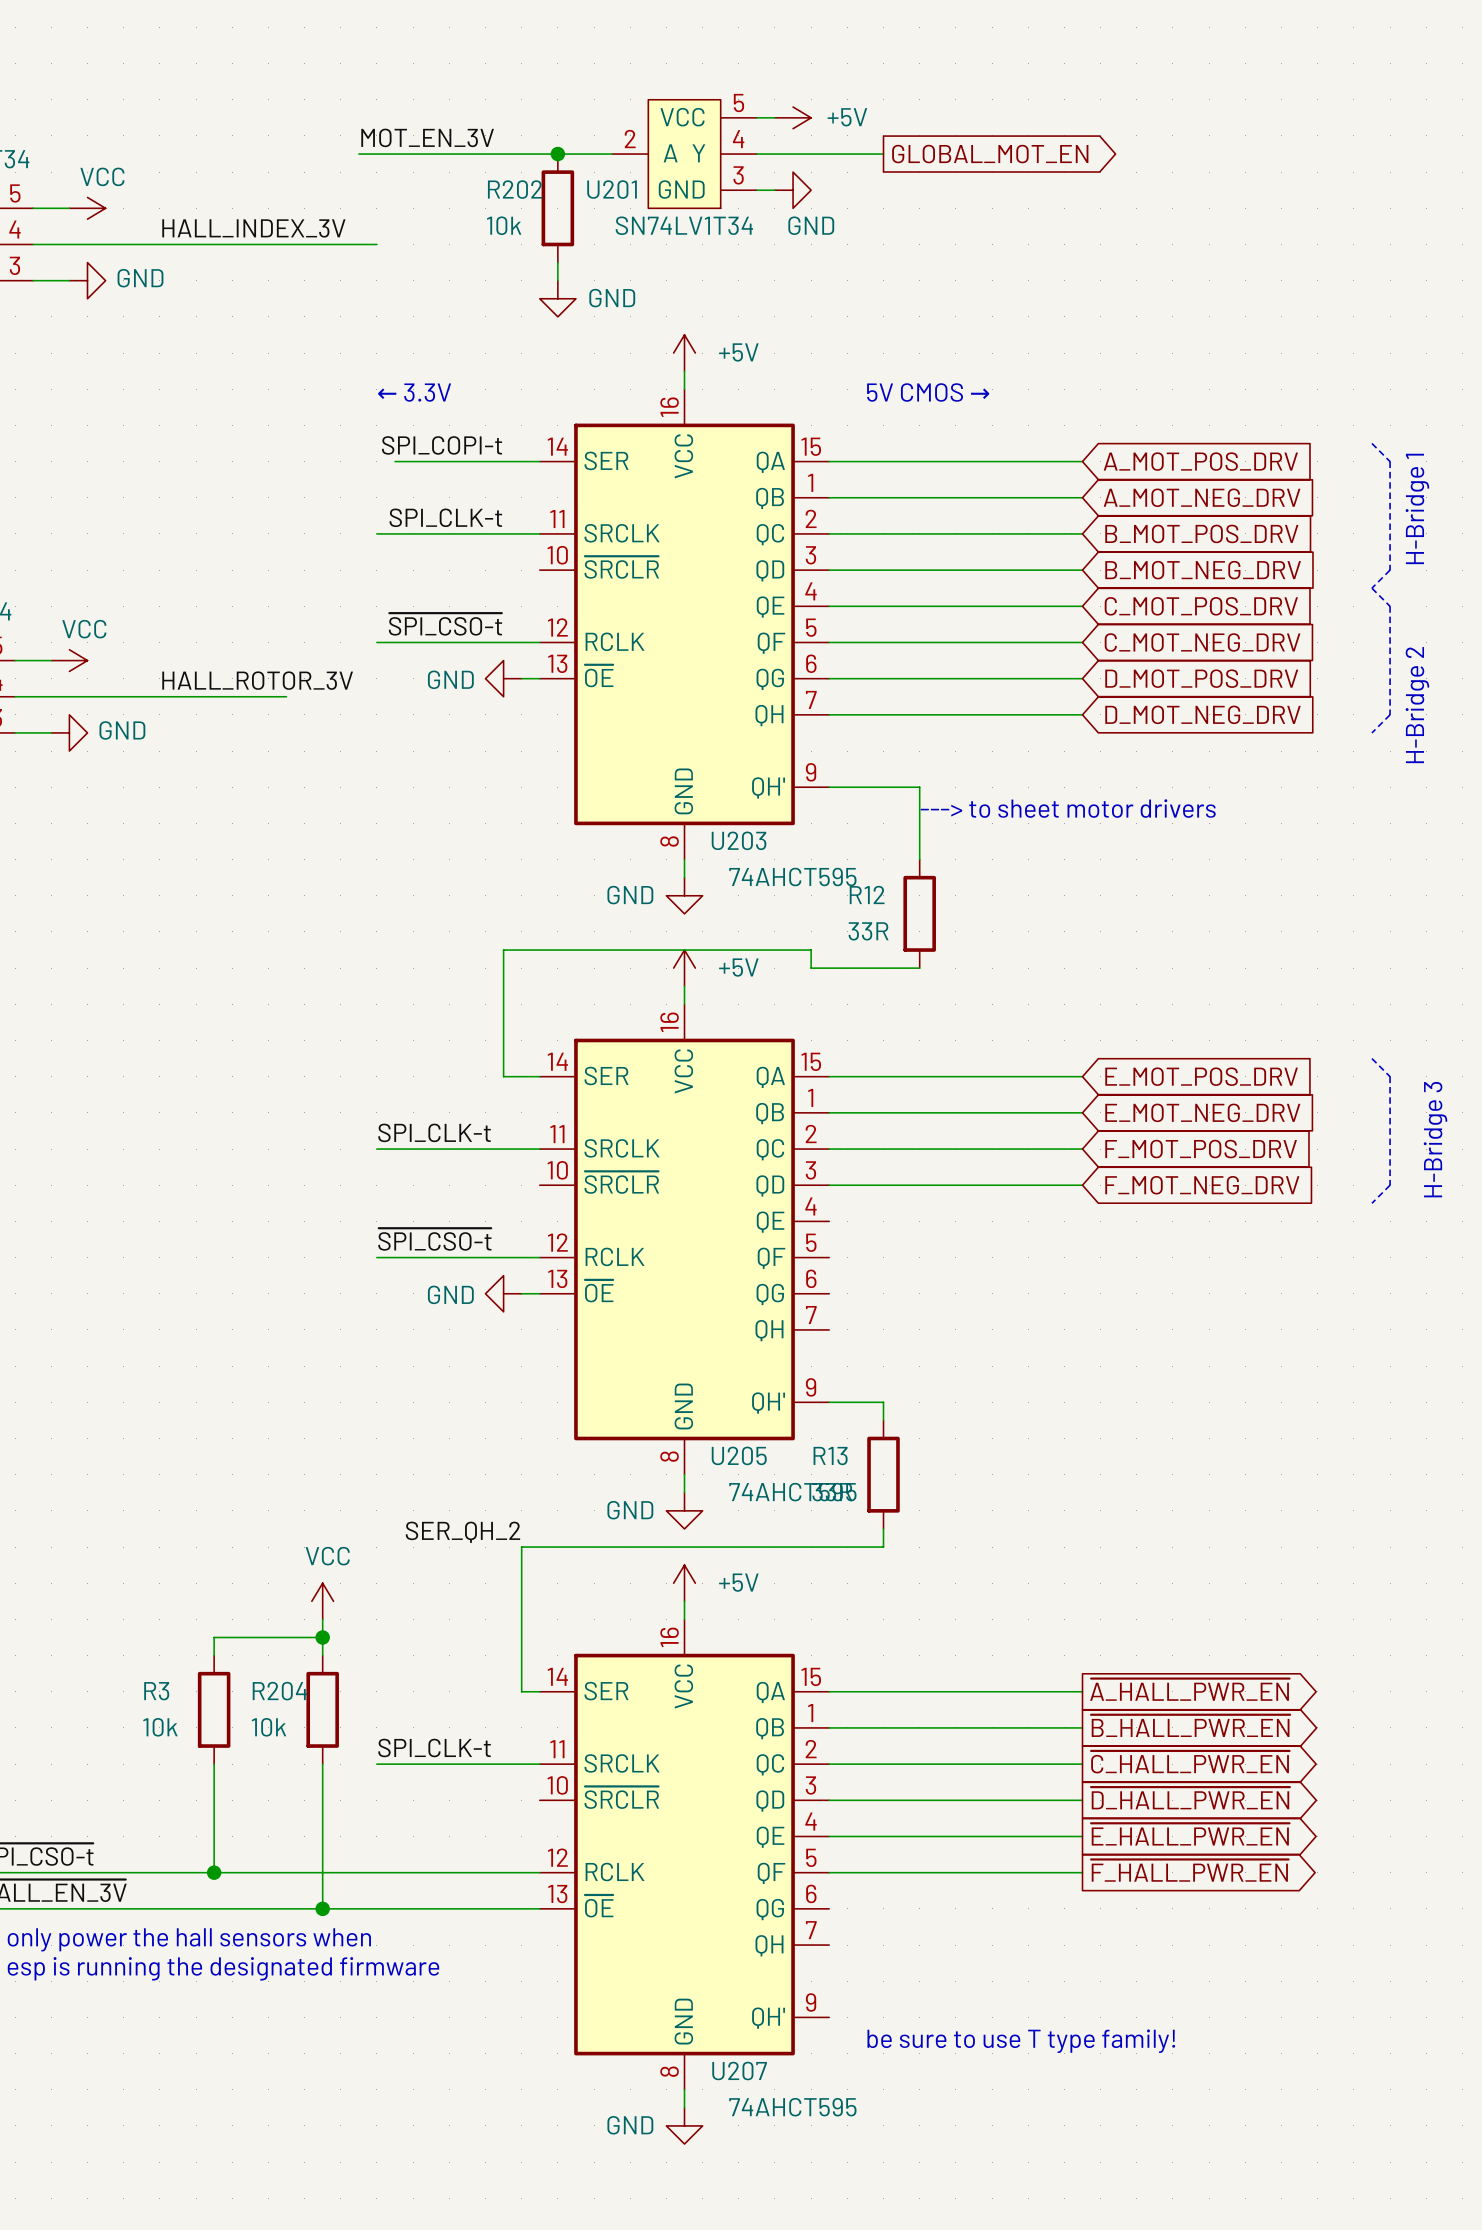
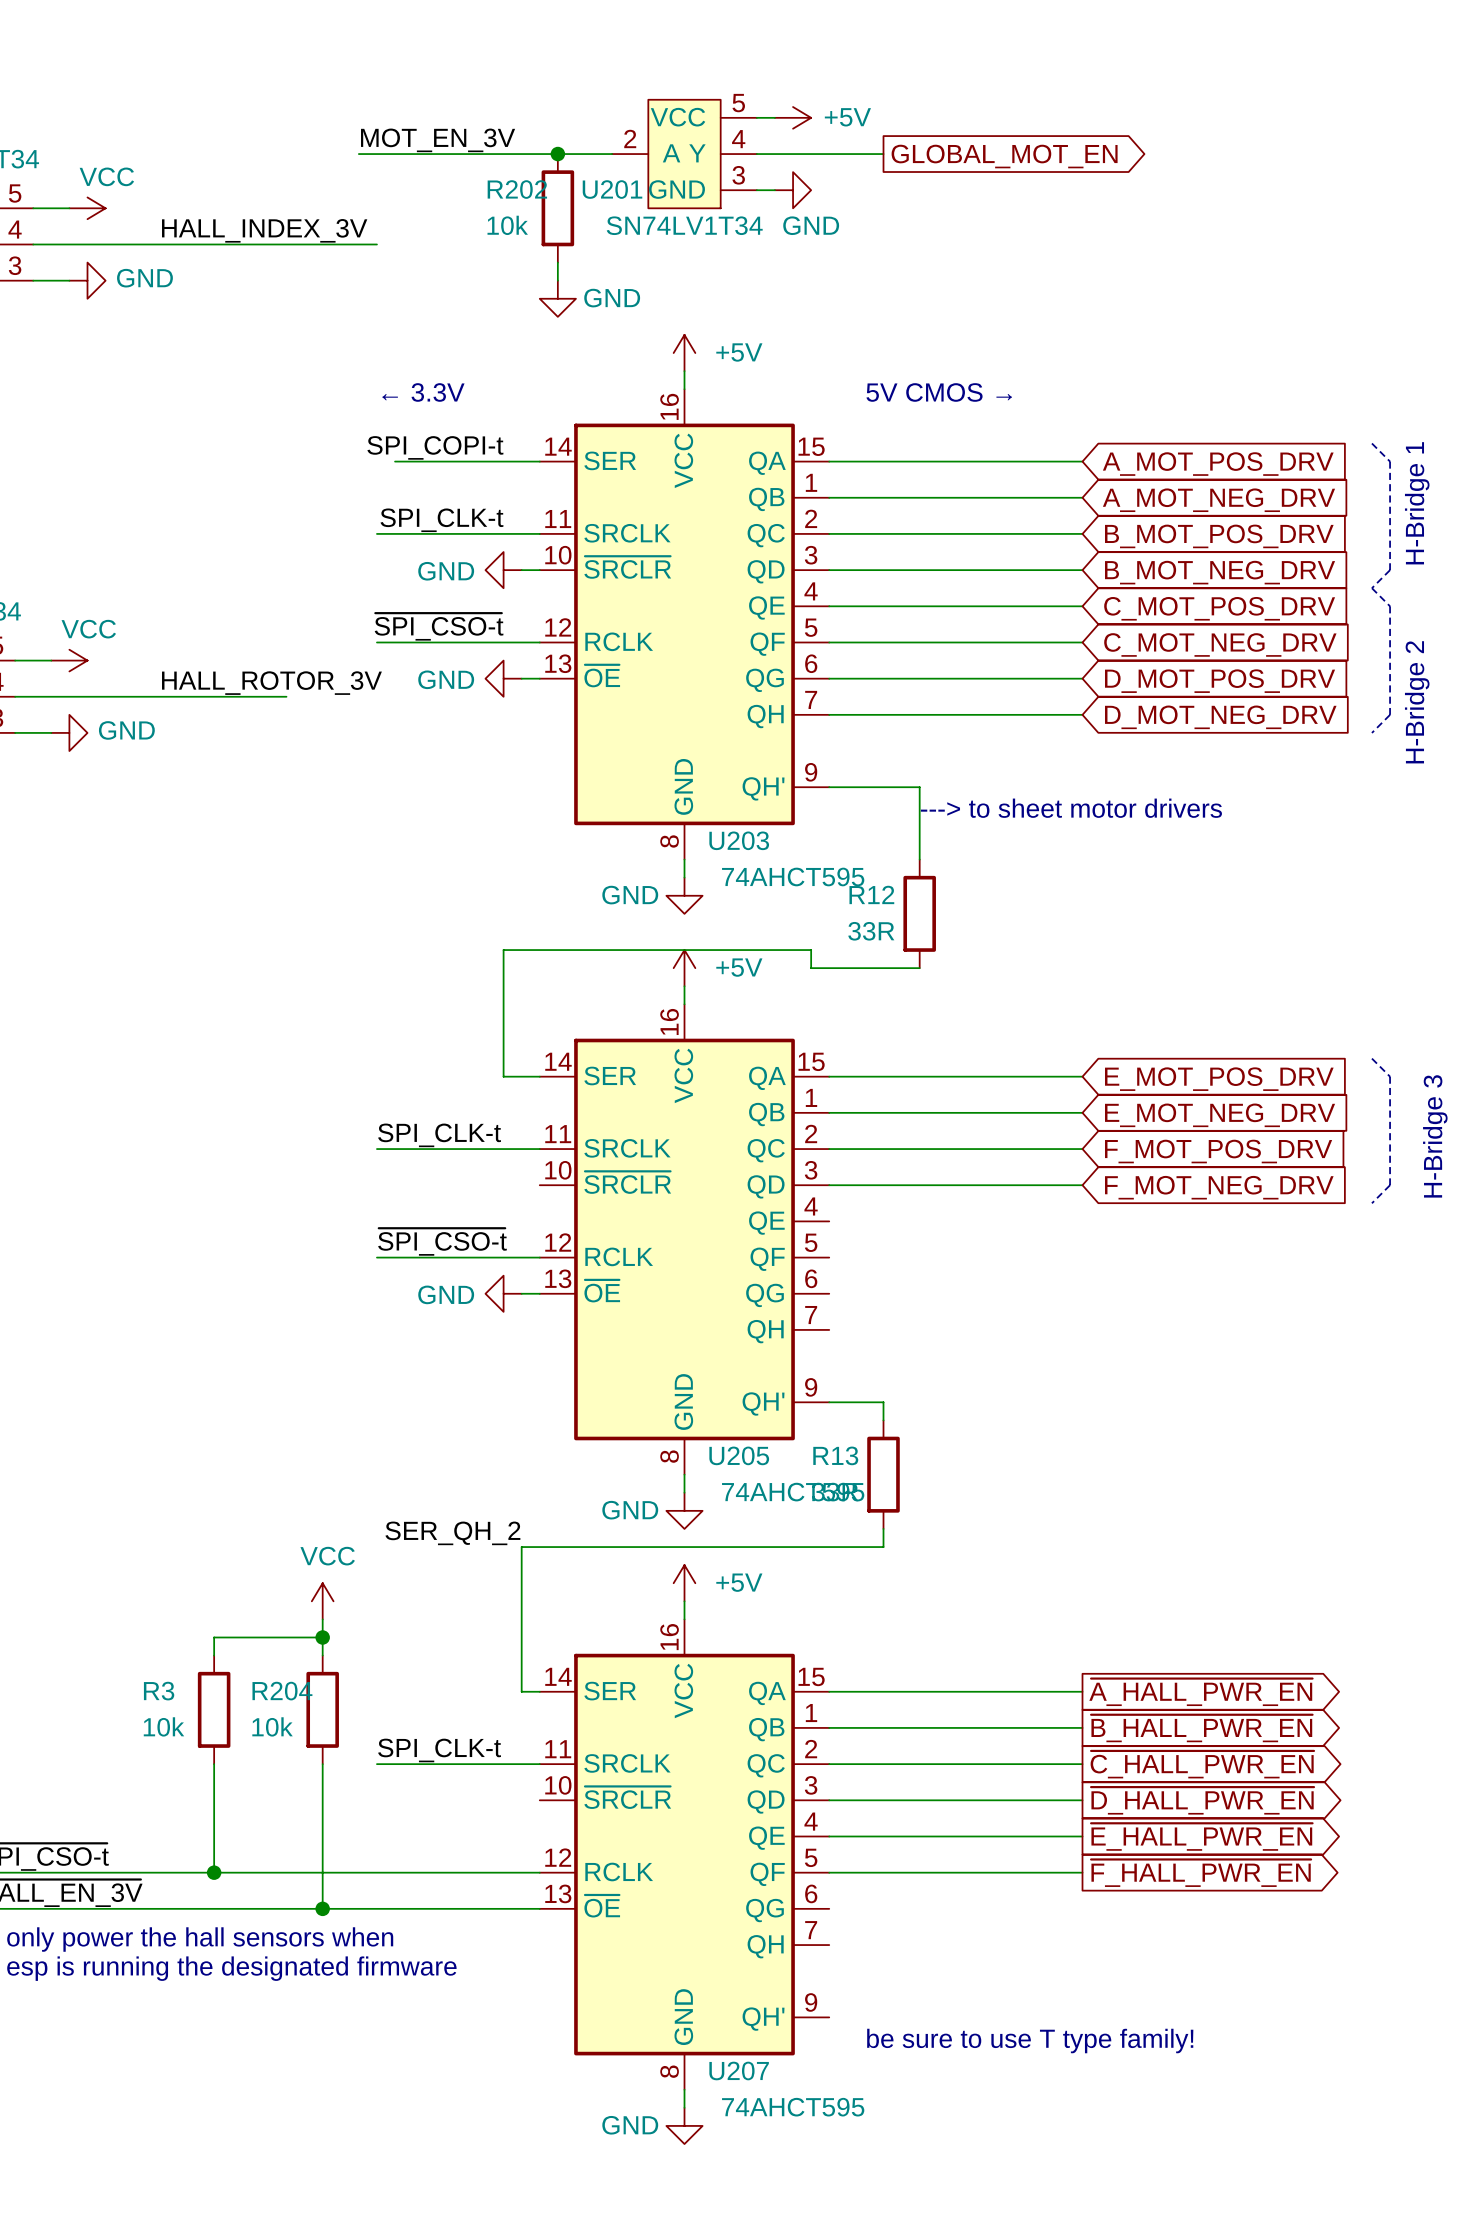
power symbol: none -> GND (503, 570)
wire: none -> (521, 570) (539, 570)

